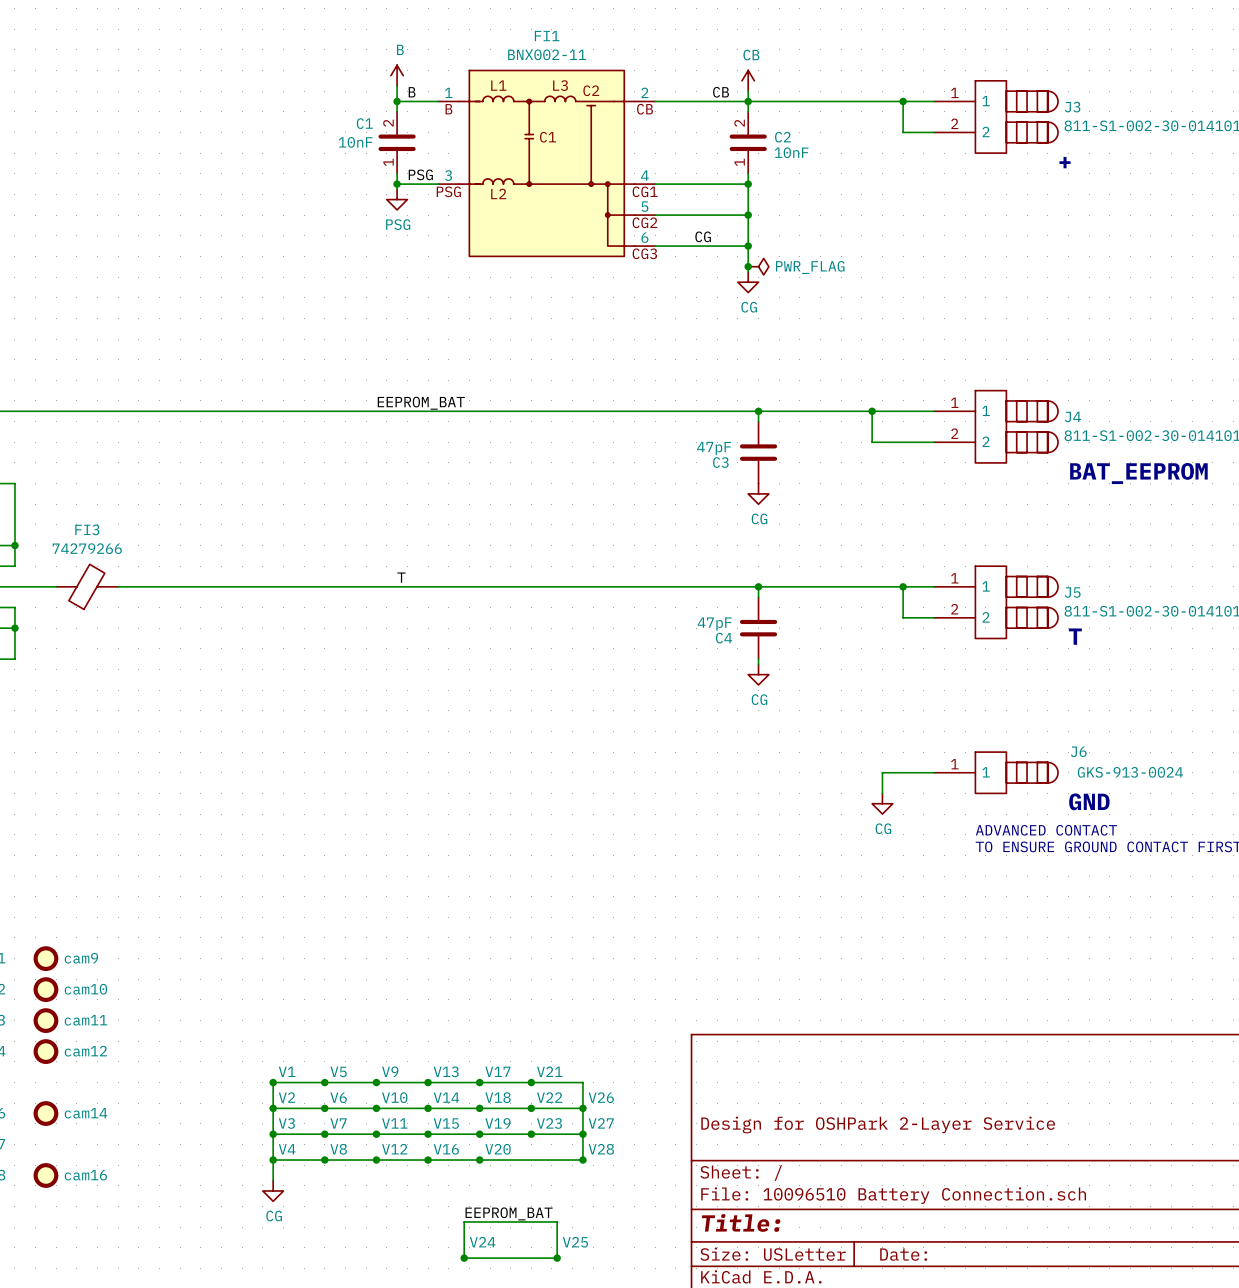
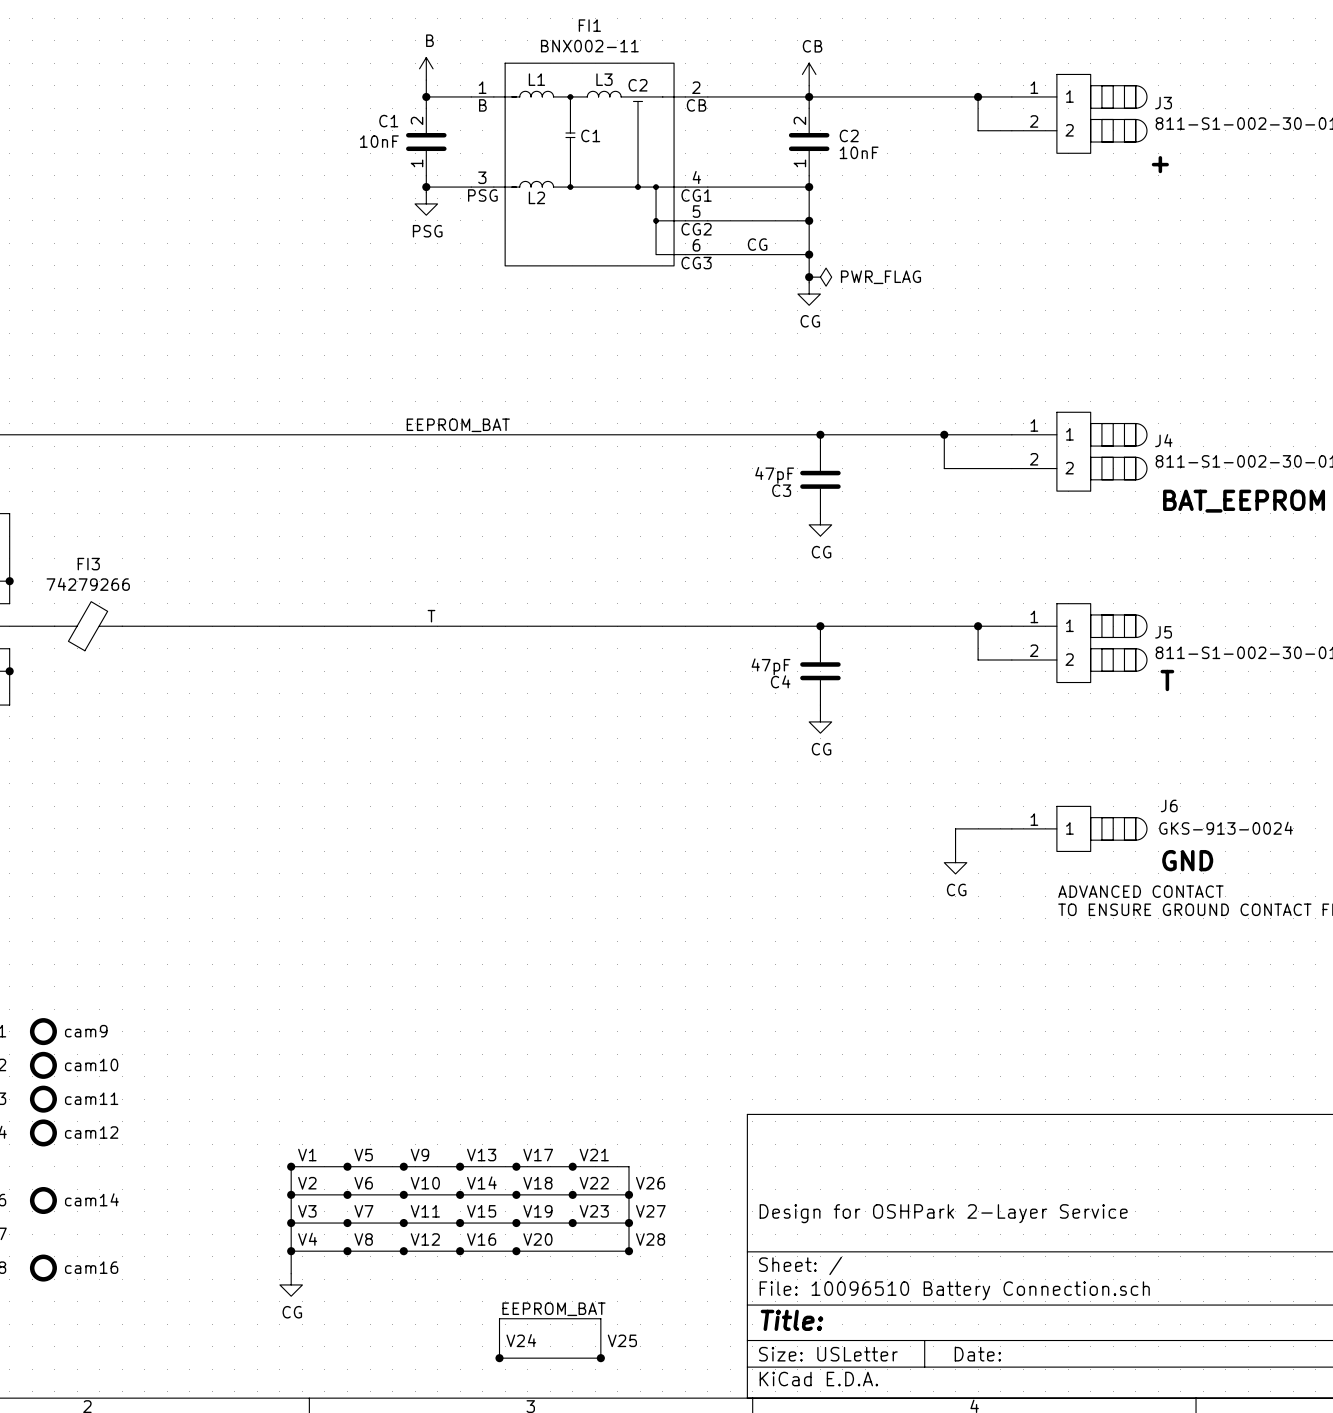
label: B (412, 92) -> none
label: CB (721, 92) -> none
label: PSG (420, 174) -> none

